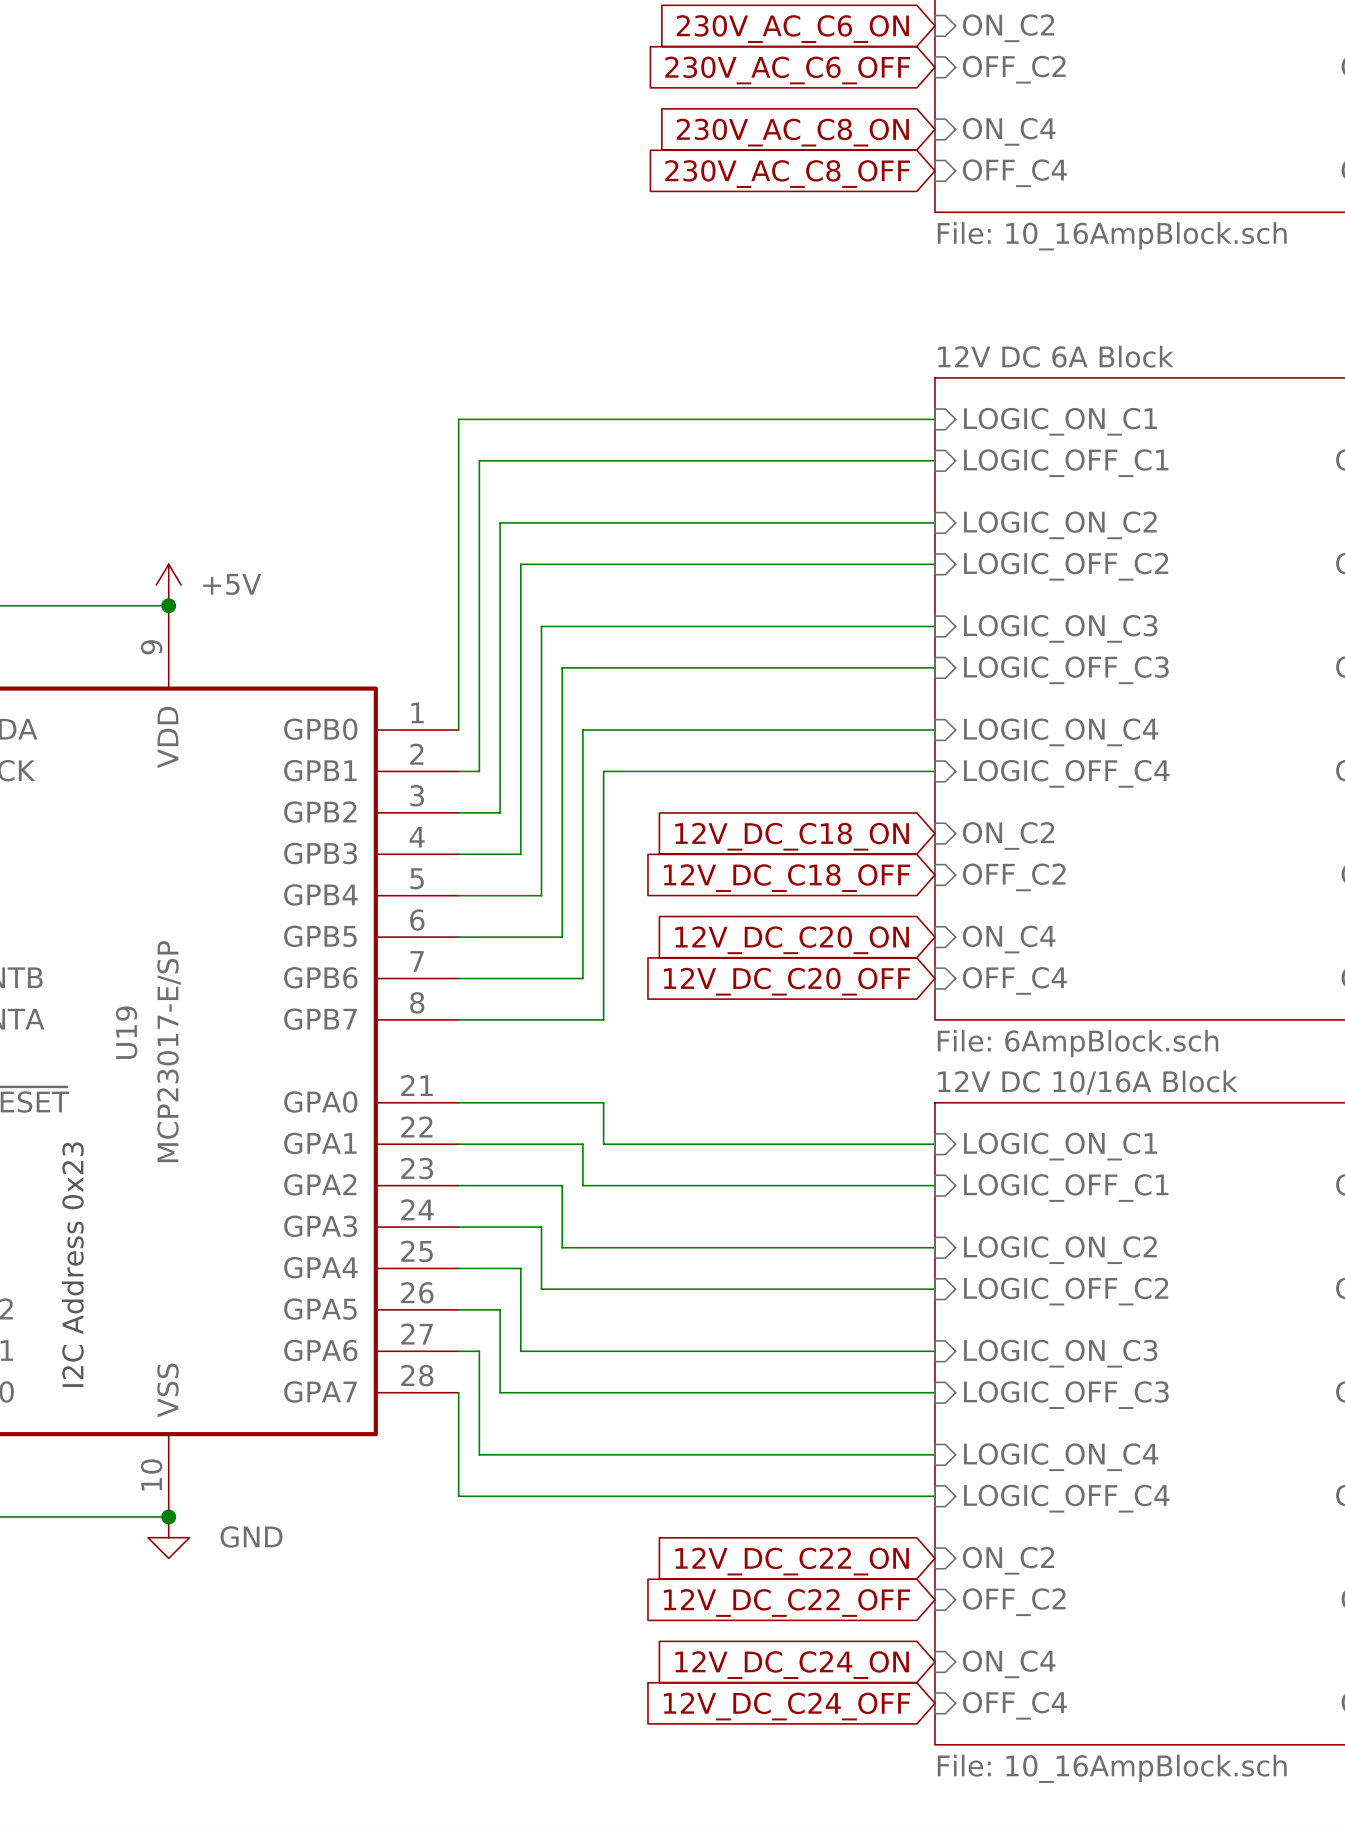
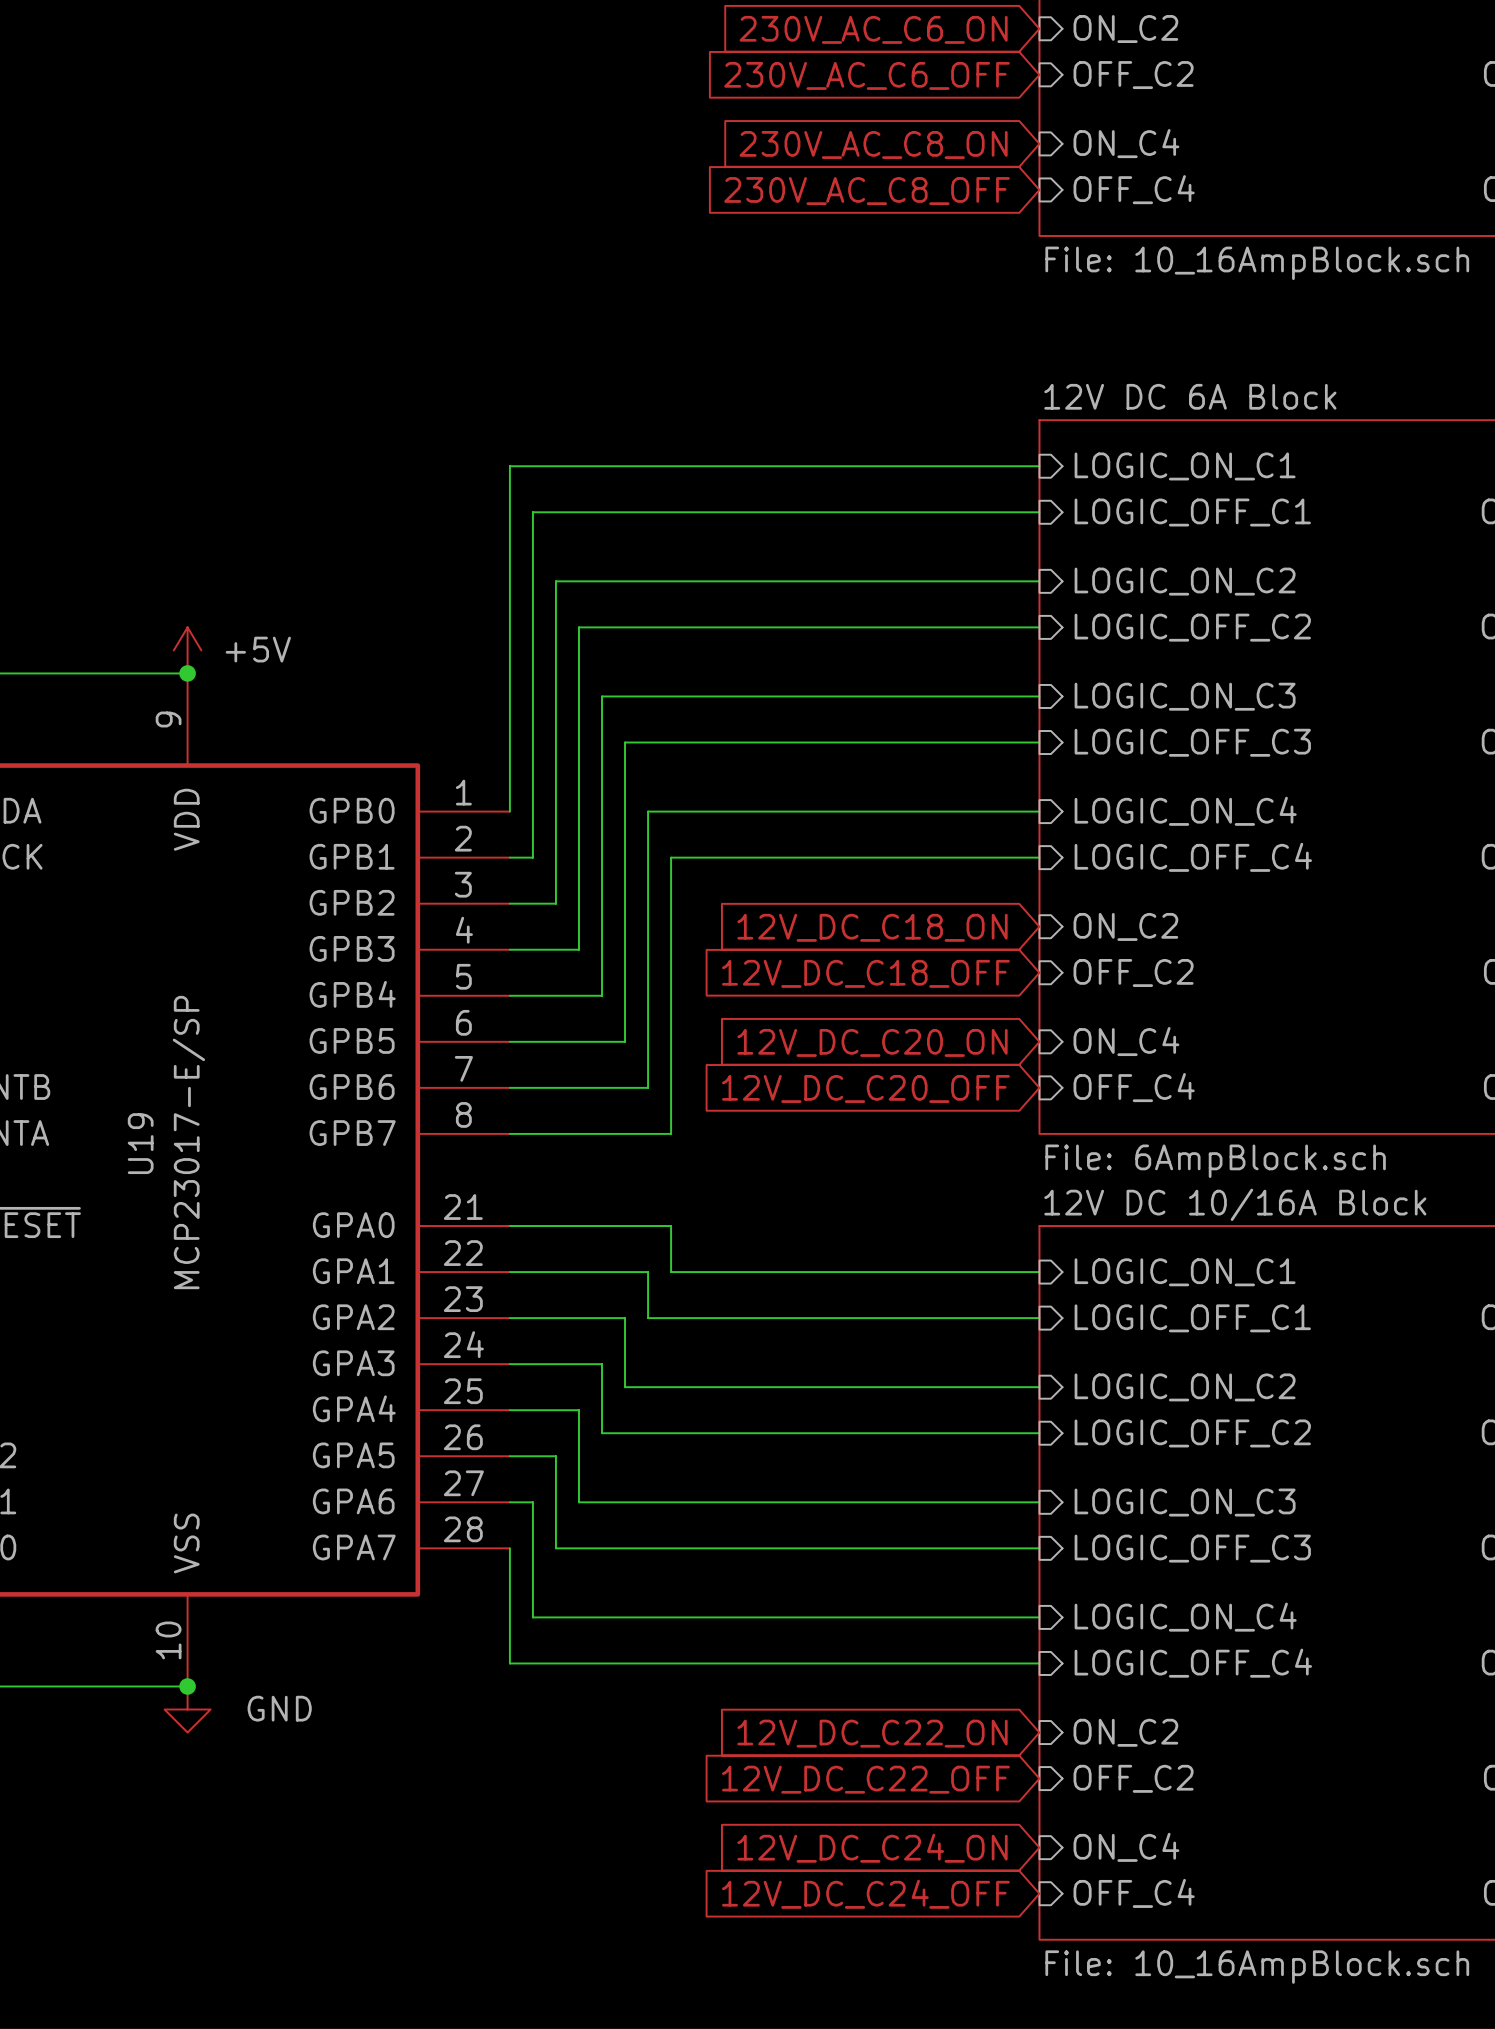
text: I2C Address 0x23 (72, 1264) -> none

